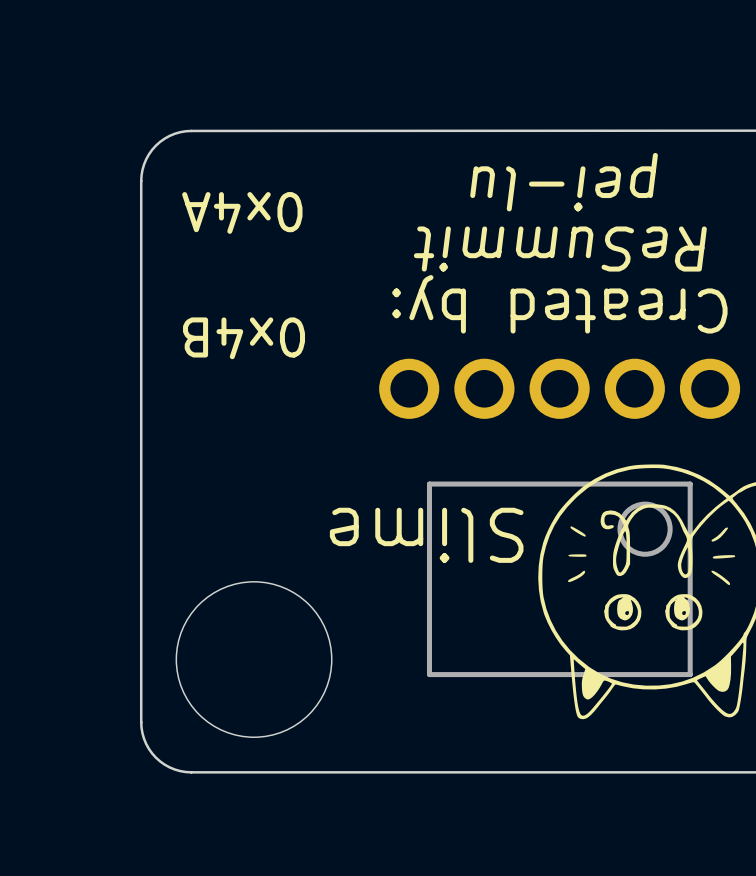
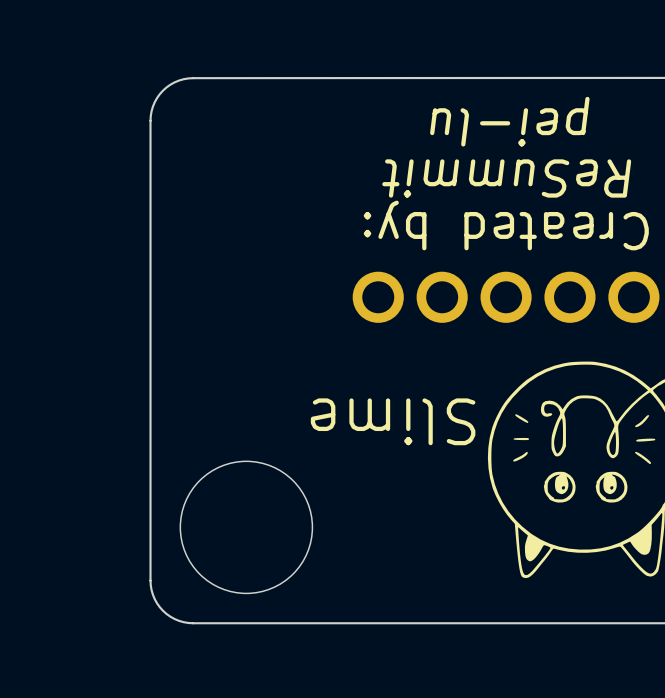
text: 0x4A (242, 212) -> none
text: 0x4B (244, 338) -> none
part: (559, 579) -> none

